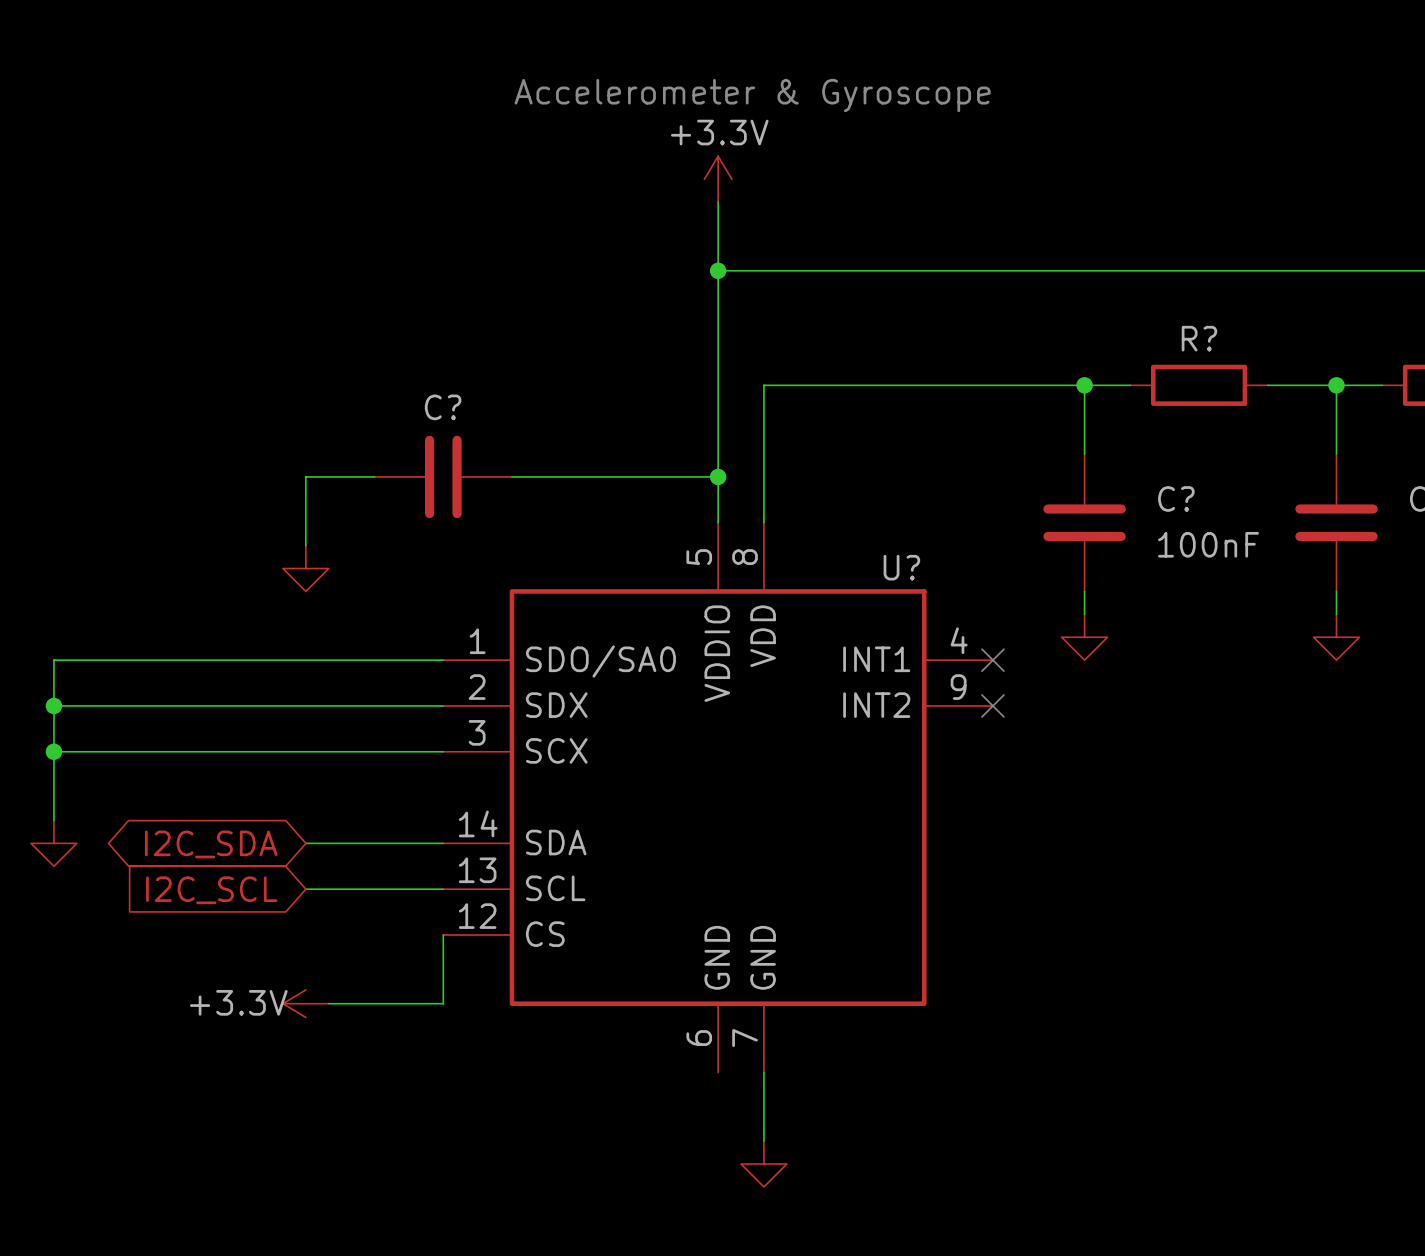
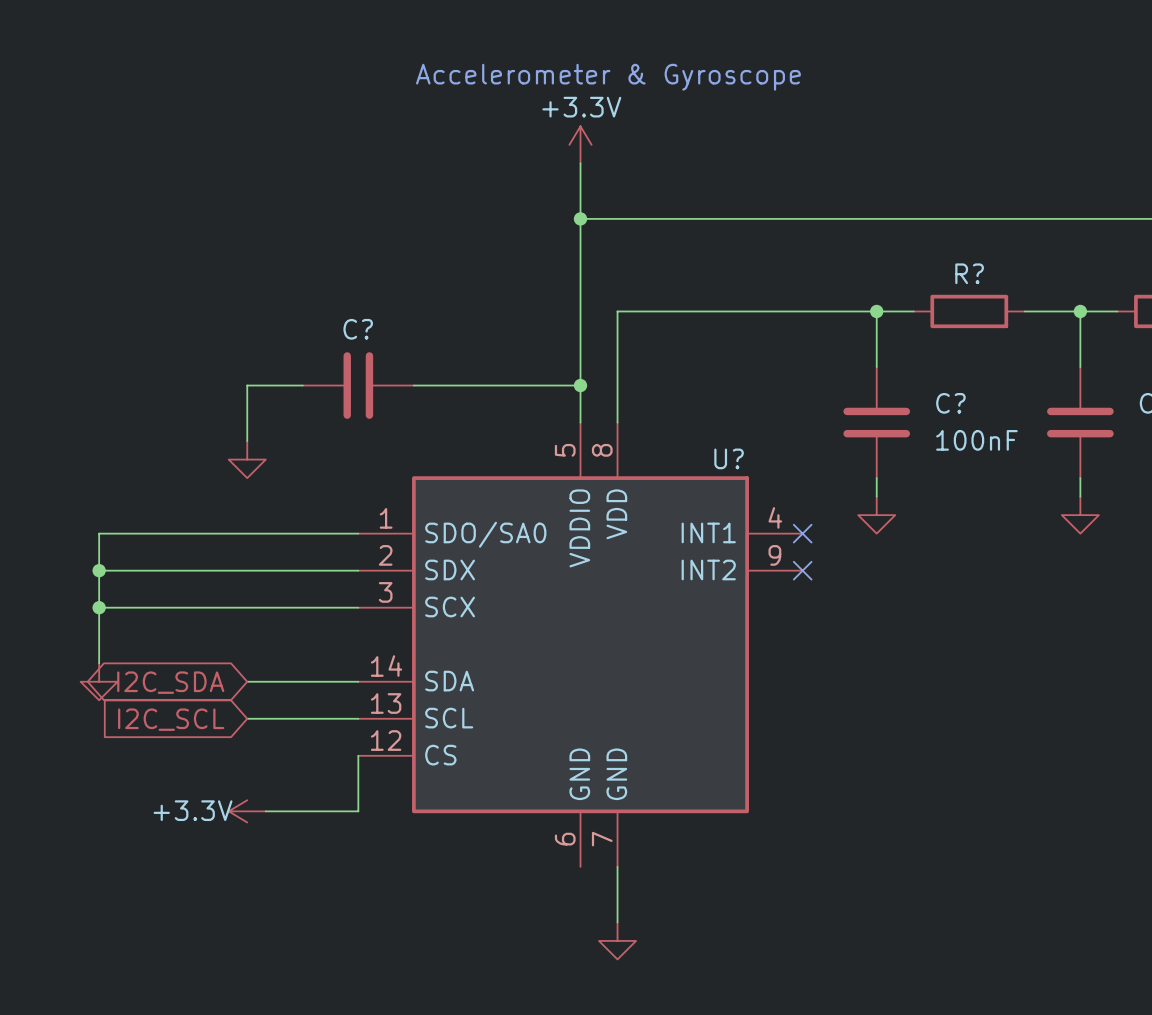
wire: (122, 660) (53, 660) (53, 820) -> (99, 533) (99, 663)
wire: (53, 705) (122, 705) -> none
junction: (53, 705) -> none
junction: none -> (99, 570)
wire: (53, 751) (122, 751) -> none
junction: (53, 751) -> none
junction: none -> (99, 607)
power symbol position: (53, 843) -> (99, 681)

